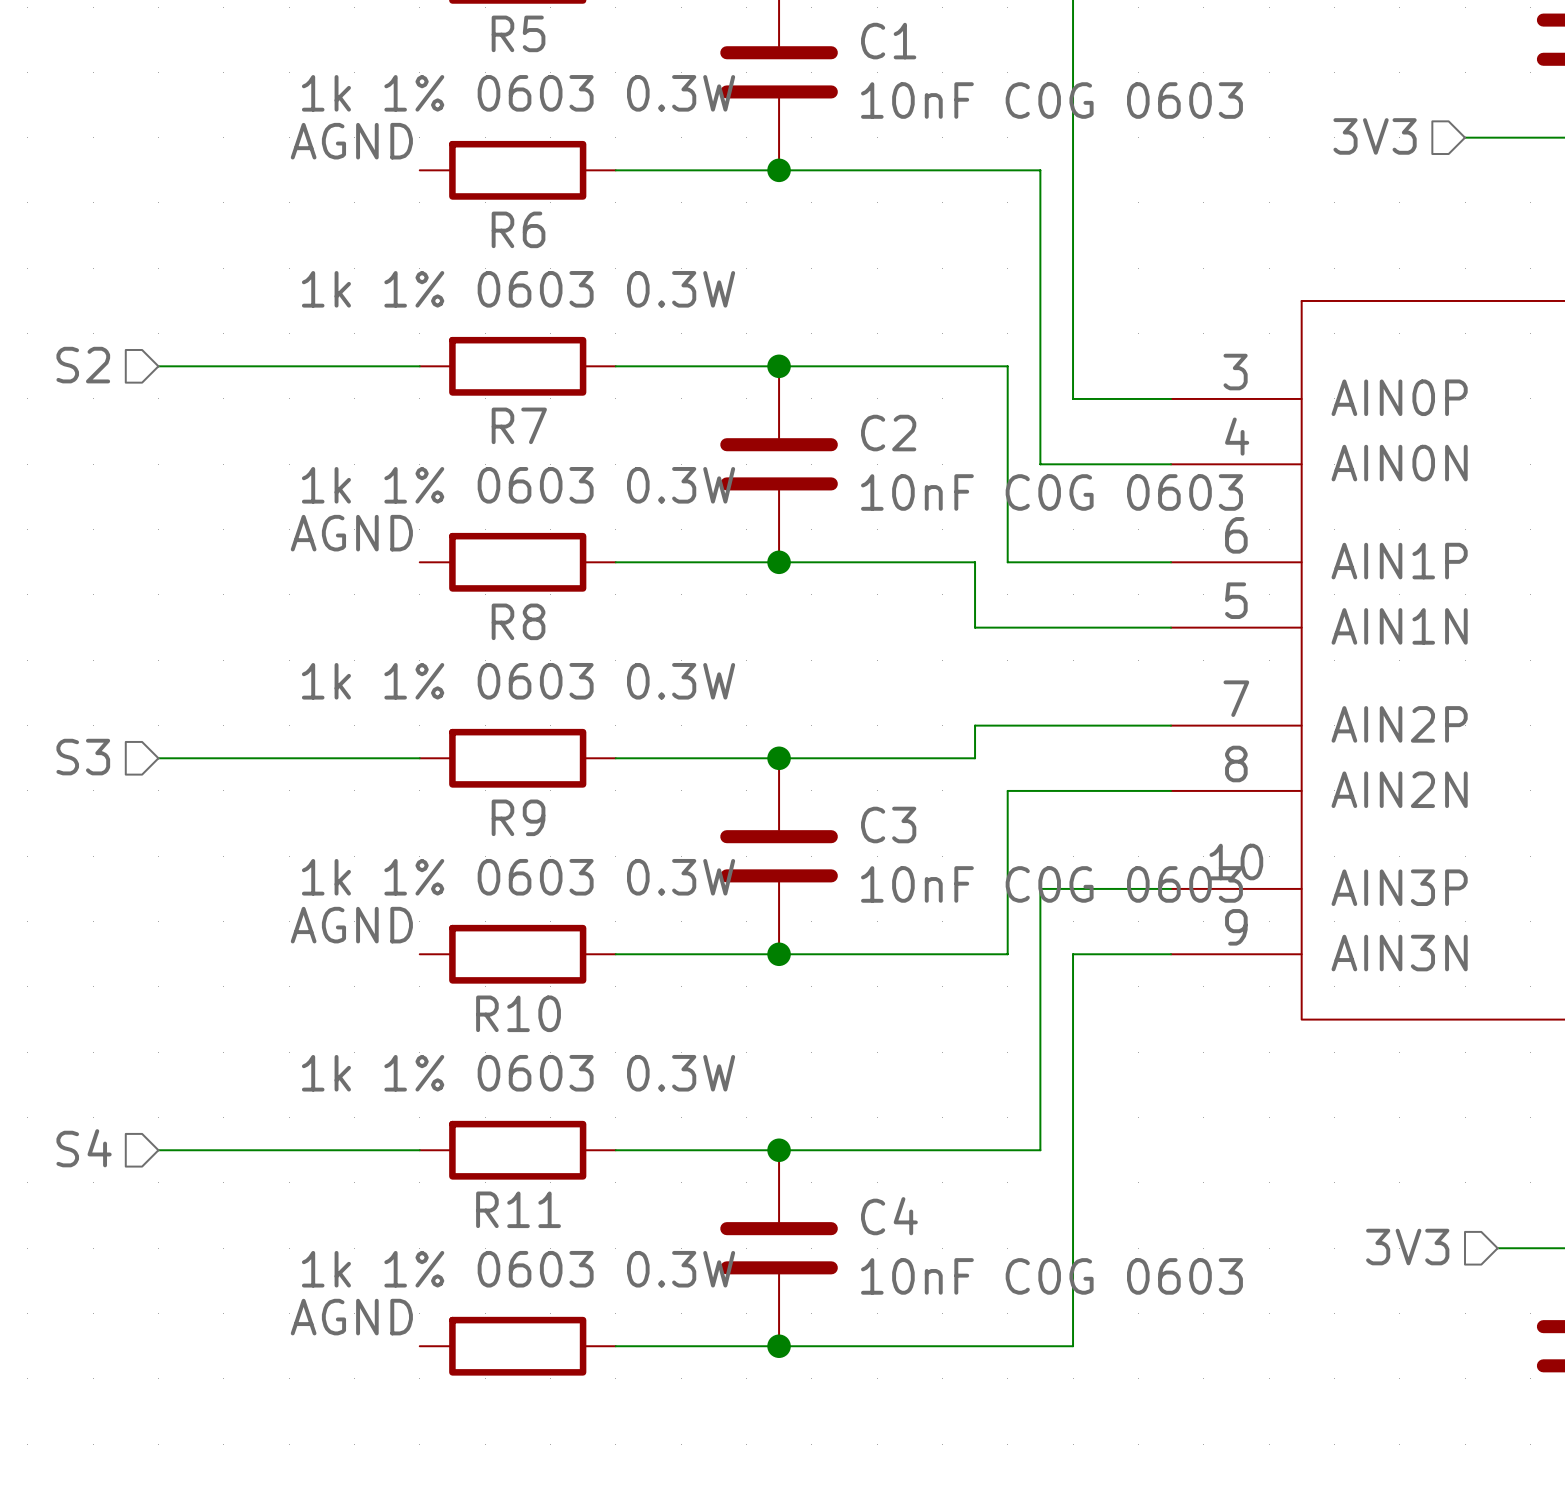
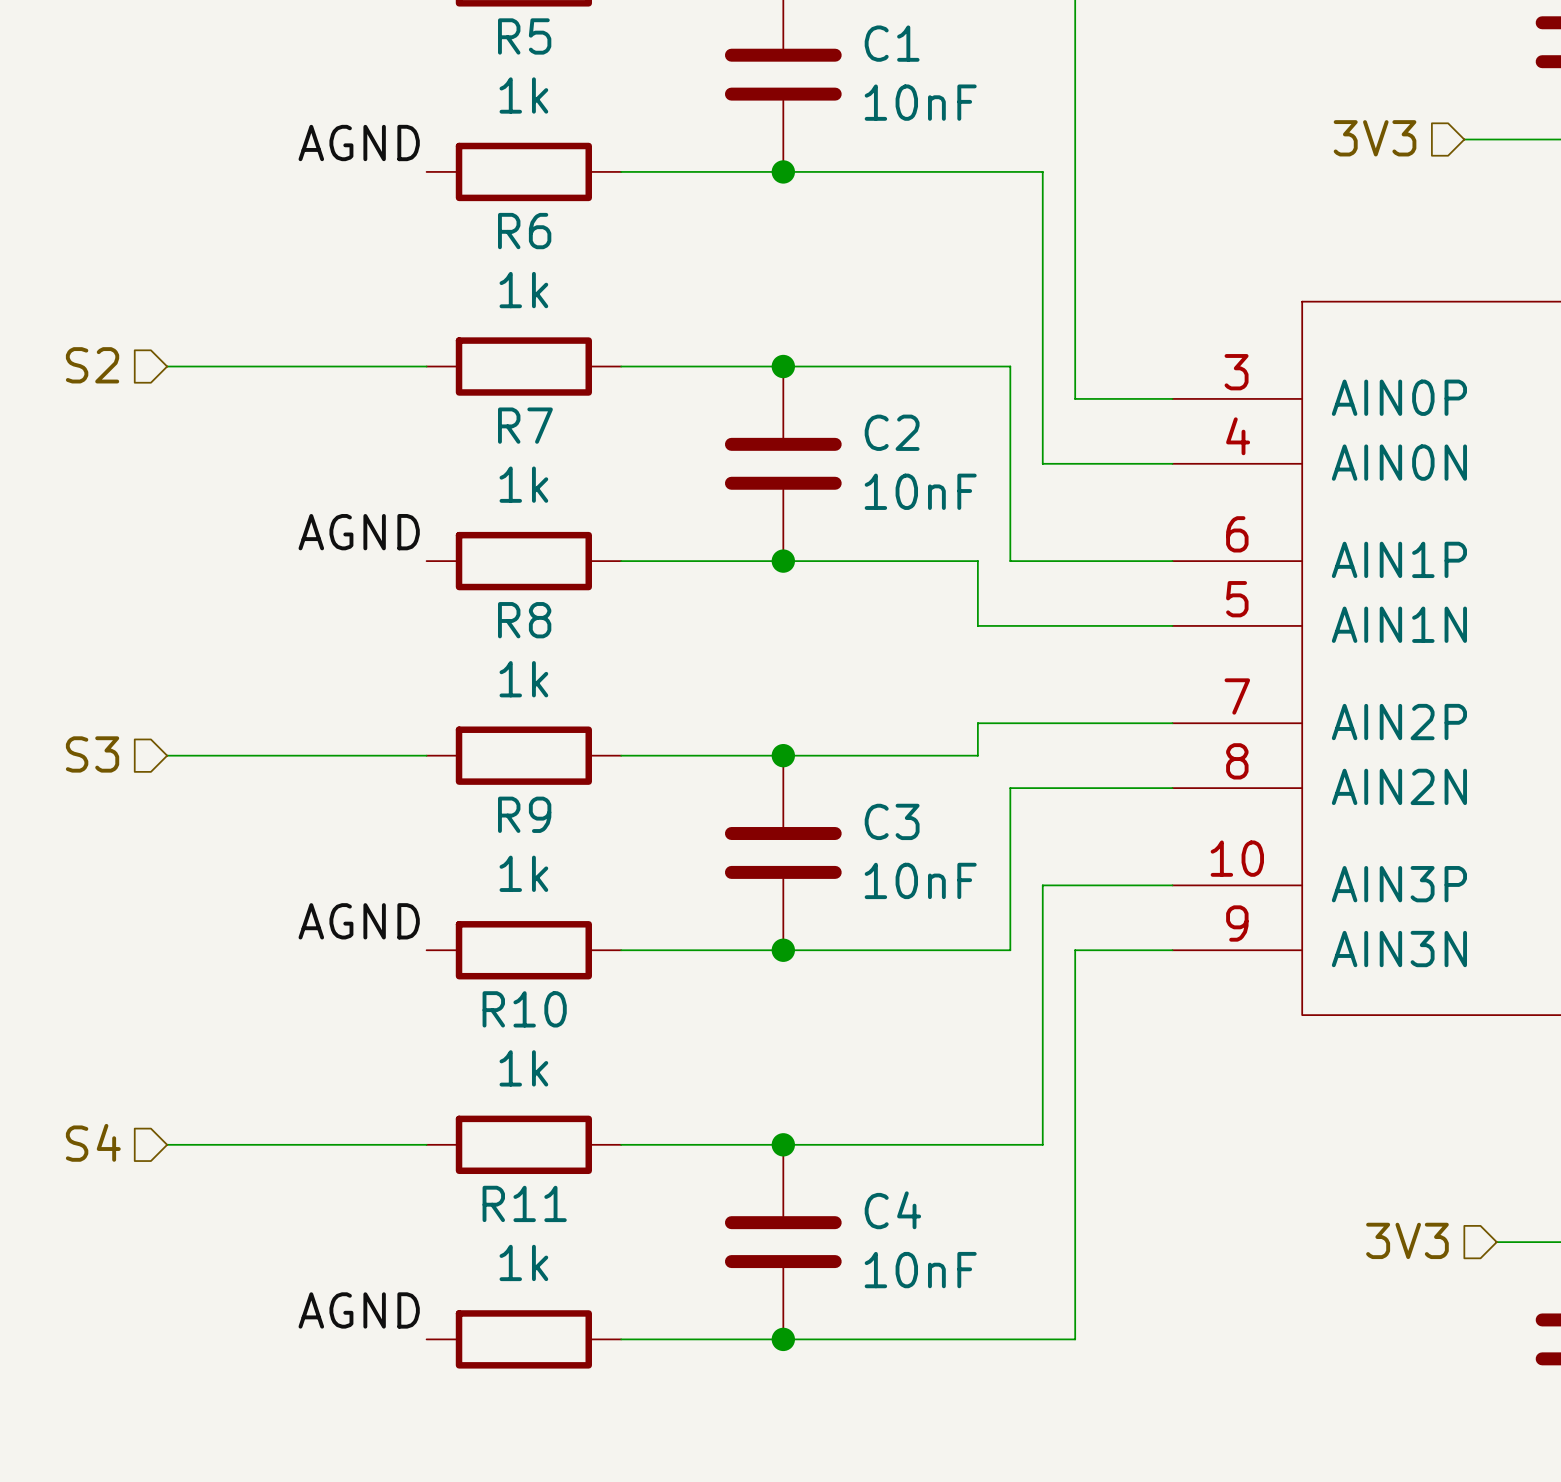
R5 value: 1k 1% 0603 0.3W (518, 93) -> 1k (523, 95)
C1 value: 10nF C0G 0603 (1051, 100) -> 10nF (920, 102)
R6 value: 1k 1% 0603 0.3W (518, 289) -> 1k (523, 290)
R7 value: 1k 1% 0603 0.3W (518, 485) -> 1k (523, 484)
C2 value: 10nF C0G 0603 (1051, 492) -> 10nF (920, 491)
R8 value: 1k 1% 0603 0.3W (518, 681) -> 1k (523, 679)
R9 value: 1k 1% 0603 0.3W (518, 877) -> 1k (523, 873)
C3 value: 10nF C0G 0603 (1051, 884) -> 10nF (920, 880)
R10 value: 1k 1% 0603 0.3W (518, 1073) -> 1k (523, 1068)
R11 value: 1k 1% 0603 0.3W (518, 1269) -> 1k (523, 1262)
C4 value: 10nF C0G 0603 (1051, 1276) -> 10nF (920, 1270)

